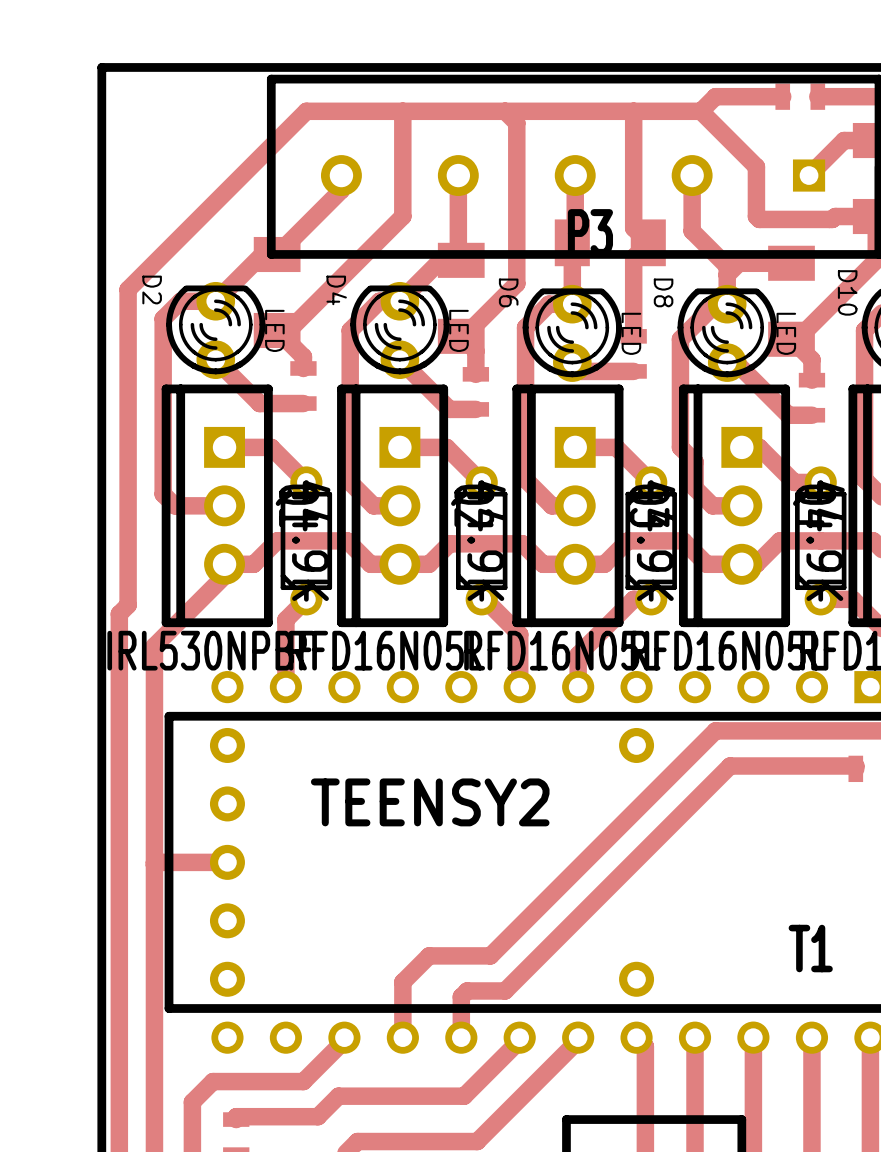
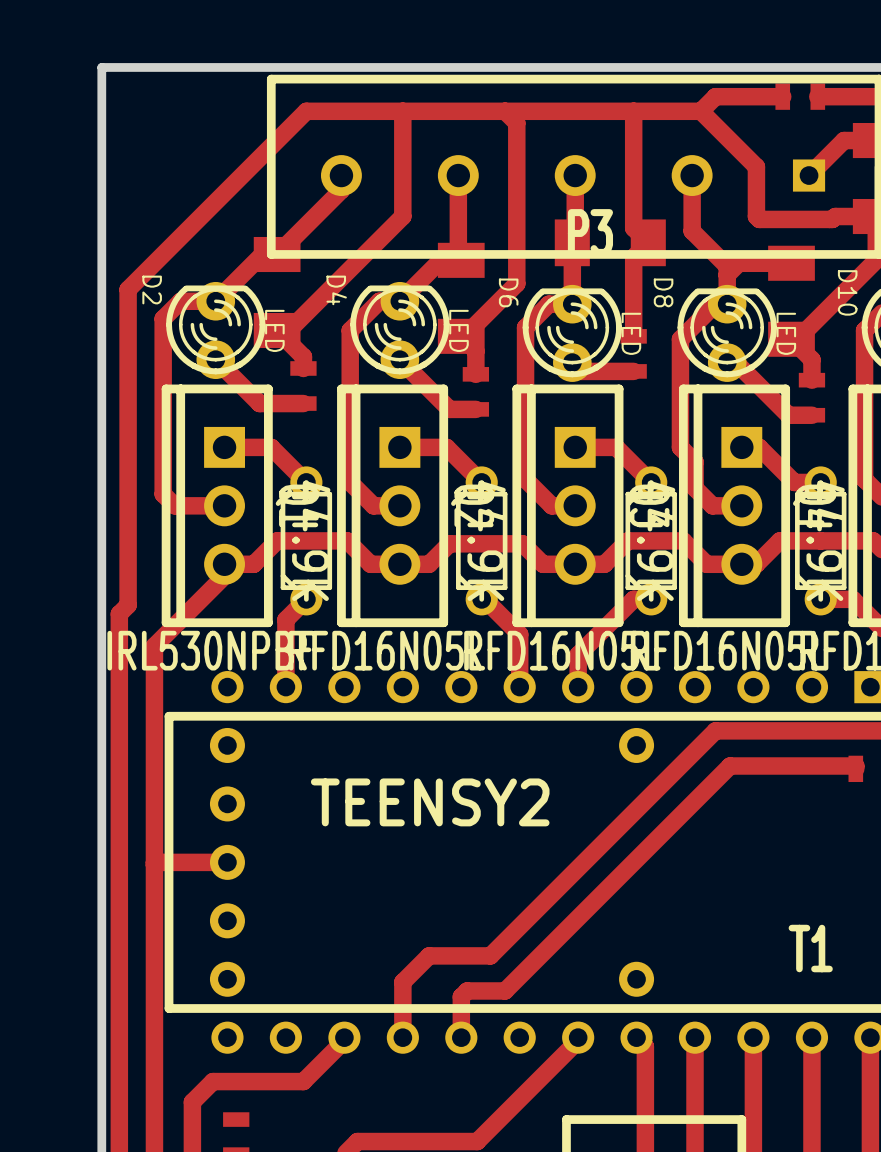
top track: (519, 1037) (519, 1040) (464, 1096) (338, 1096) (318, 1116) (236, 1116) (236, 1119) -> none

